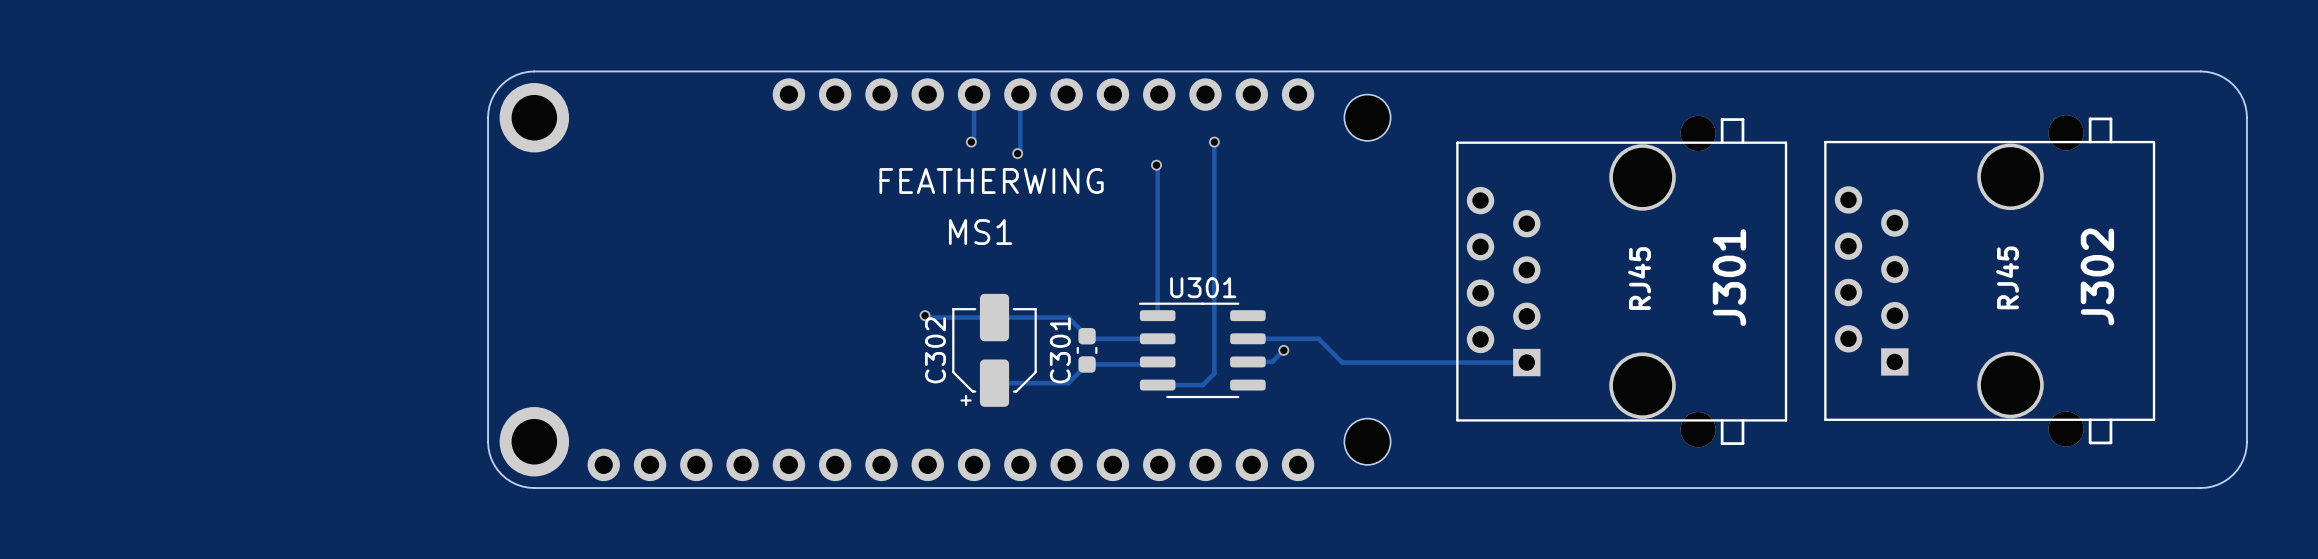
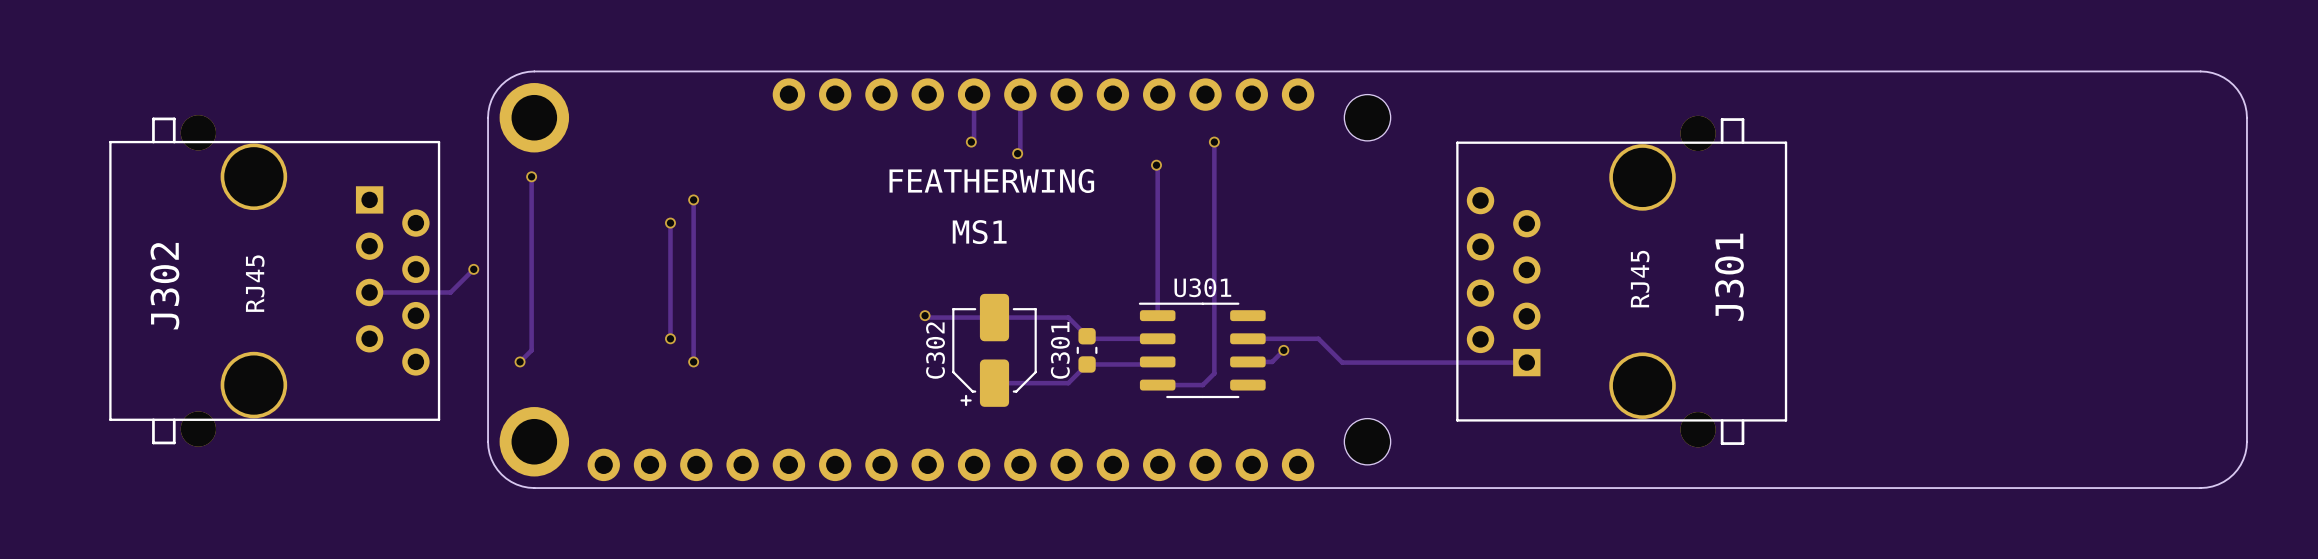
track: none -> (531, 176) (531, 350) (520, 361)
via: none -> (531, 176)
track: none -> (693, 199) (693, 361)
via: none -> (693, 199)
track: none -> (670, 223) (670, 338)
via: none -> (670, 223)
track: none -> (473, 269) (450, 292) (369, 292)
via: none -> (473, 269)
J302 rotation: 0° (1989, 280) -> 180° (274, 280)
J302 position: (1989, 280) -> (274, 280)
via: none -> (670, 338)
via: none -> (520, 361)
via: none -> (693, 361)

